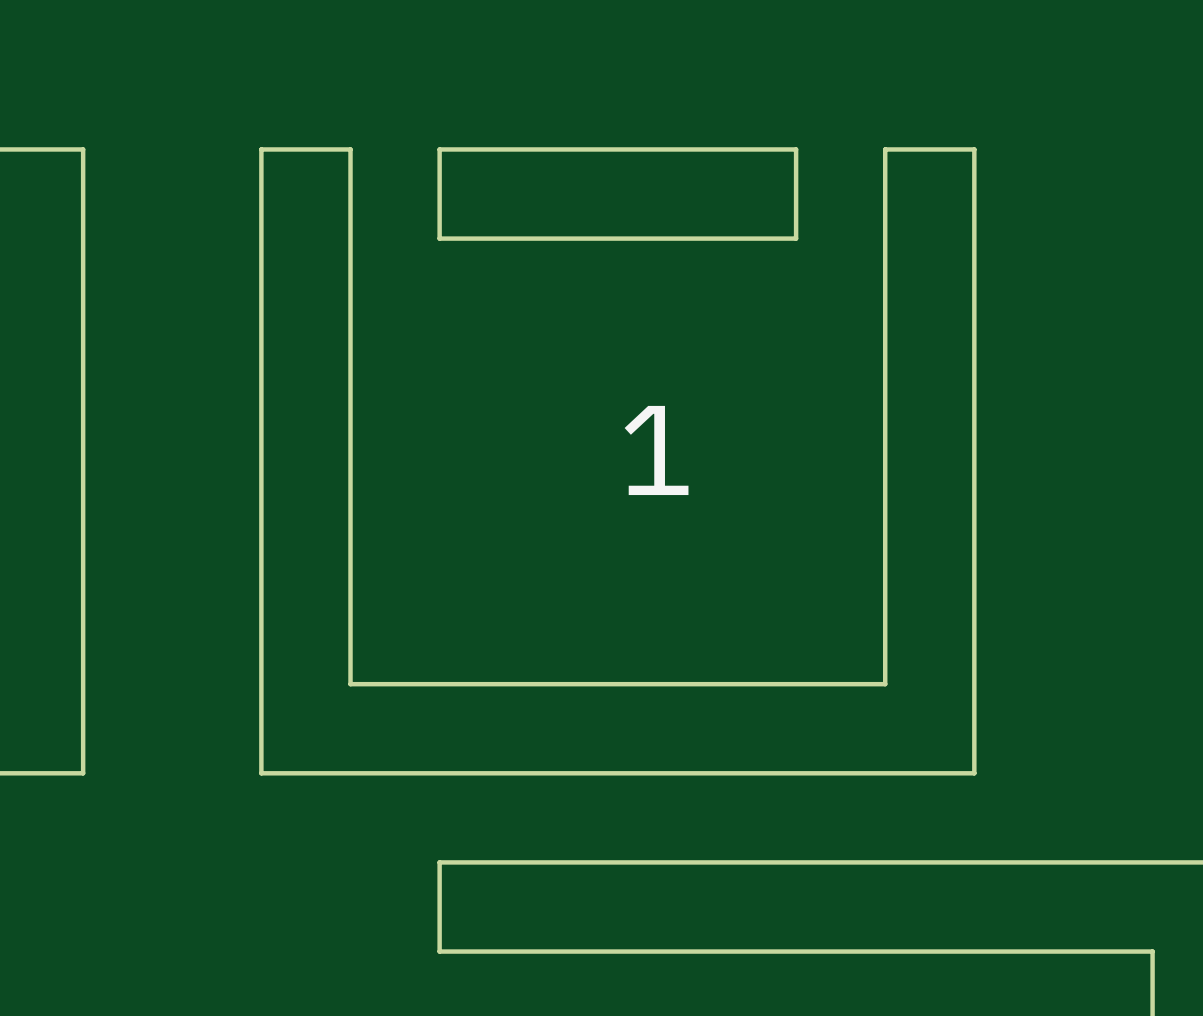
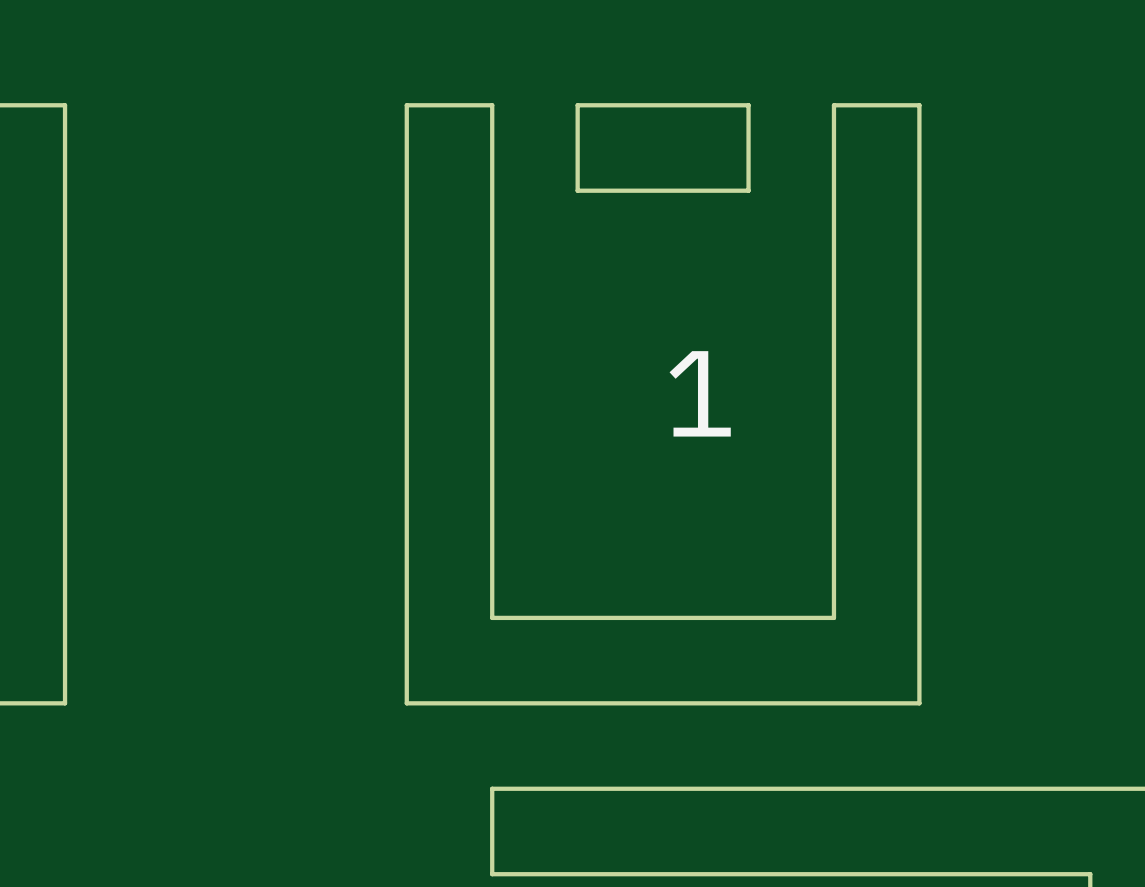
board edge: (528, 149) (617, 149) -> (577, 190) (577, 105)
board edge: none -> (492, 105) (492, 617)
board edge: (439, 238) (617, 238) -> none
text position: 1 (656, 450) -> 1 (700, 393)
board edge: (528, 684) (350, 684) (350, 149) (261, 149) (261, 773) (439, 773) -> (406, 190) (406, 703)
board edge: (528, 862) (439, 862) (439, 951) (528, 951) -> (492, 788) (492, 874)

